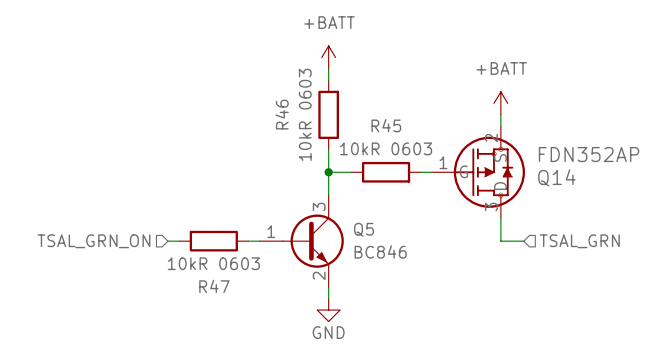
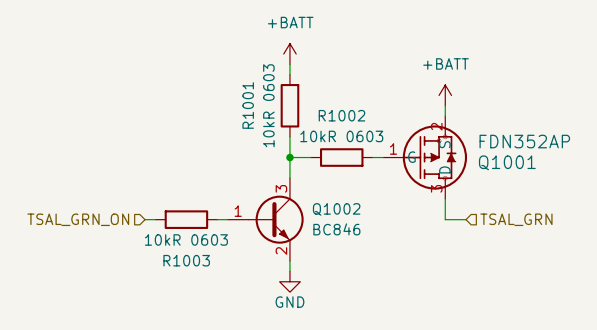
R46 name: R46 (282, 114) -> R1001 (248, 105)
R45 name: R45 (386, 125) -> R1002 (341, 115)
Q14 name: Q14 (556, 177) -> Q1001 (507, 162)
Q5 name: Q5 (364, 229) -> Q1002 (336, 209)
R47 name: R47 (214, 286) -> R1003 (186, 260)

